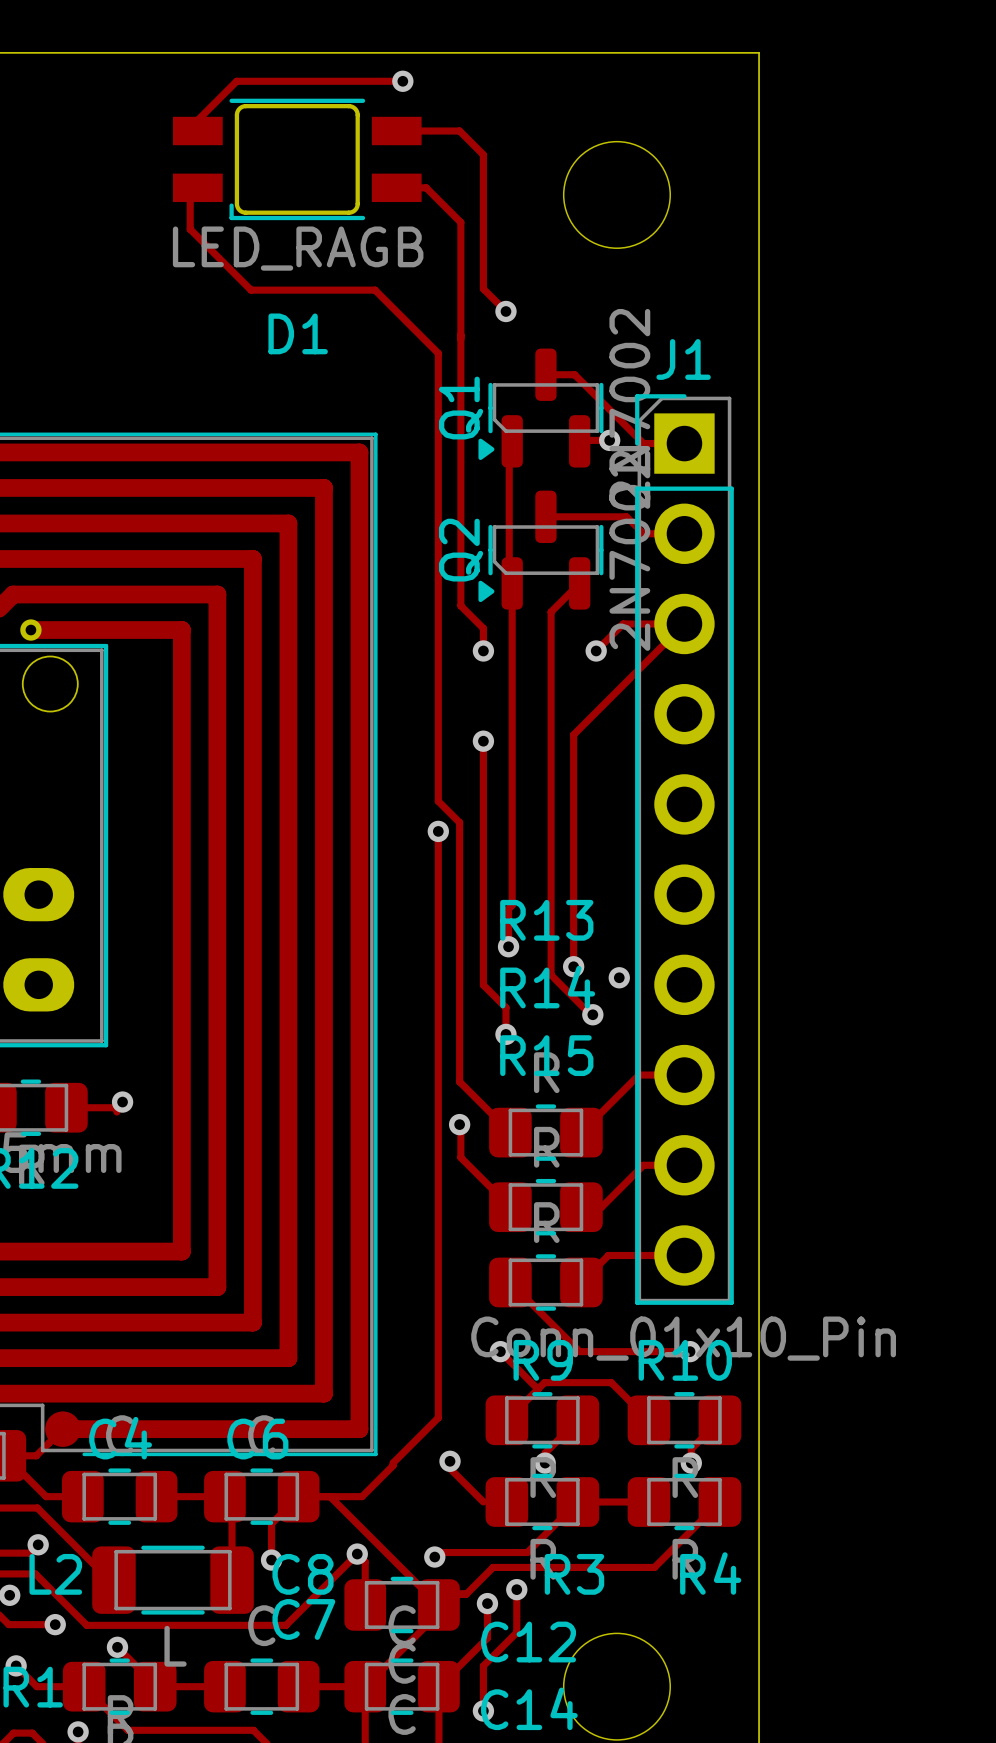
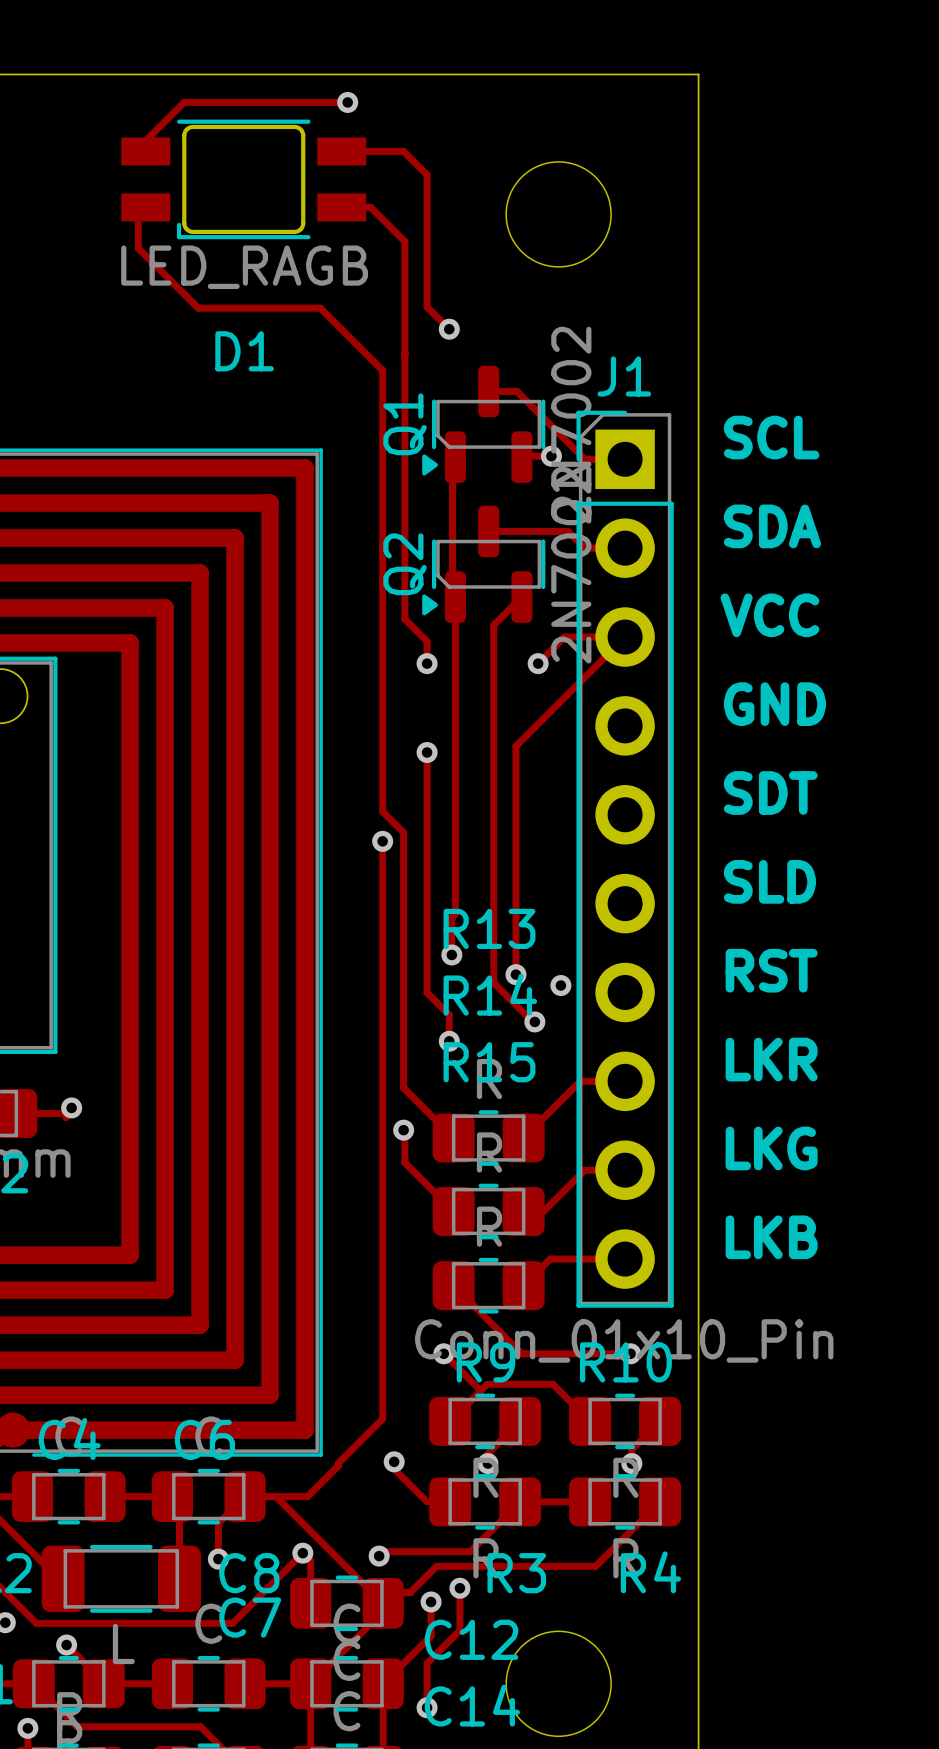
text: none -> SCL (771, 437)
text: none -> SDA (772, 526)
text: none -> VCC (769, 615)
text: none -> GND (774, 704)
text: none -> SDT (770, 792)
text: none -> SLD (769, 881)
text: none -> RST (771, 970)
text: none -> LKR (771, 1059)
text: none -> LKG (771, 1148)
text: none -> LKB (771, 1237)

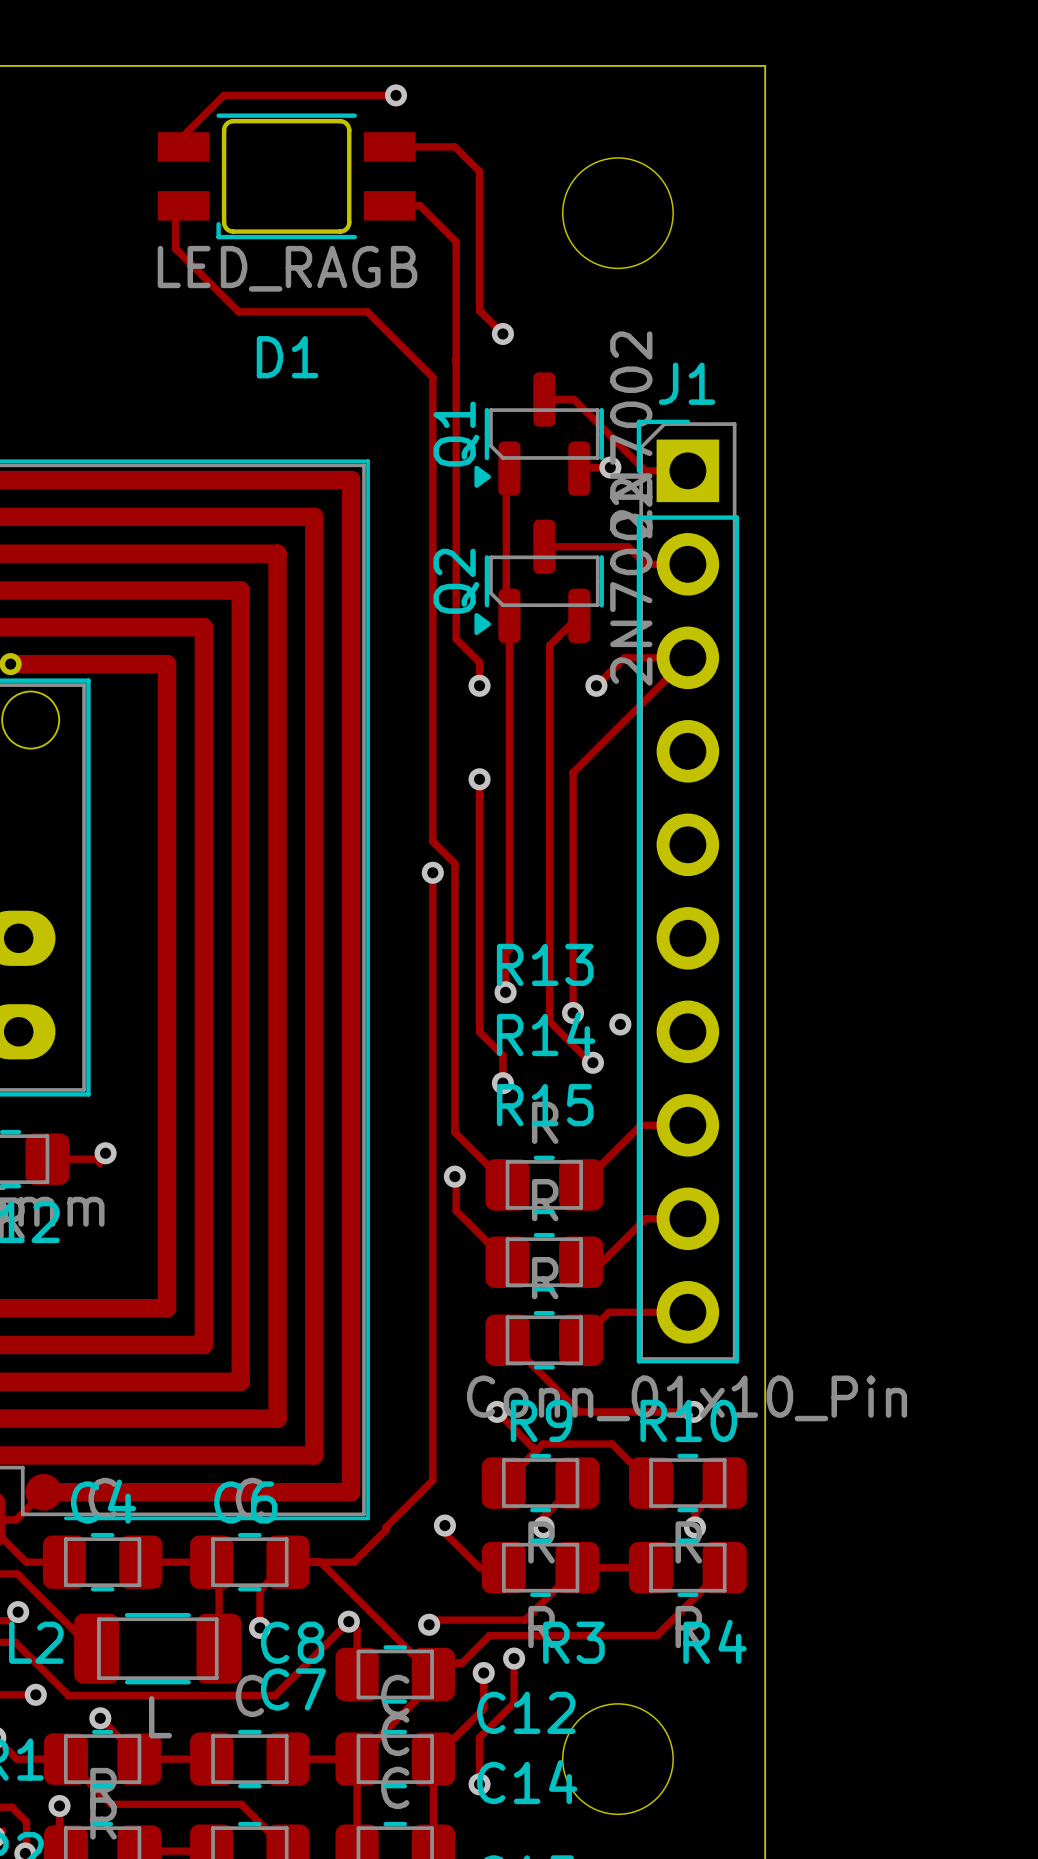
text: SCL (771, 437) -> none
text: SDA (772, 526) -> none
text: VCC (769, 615) -> none
text: GND (774, 704) -> none
text: SDT (770, 792) -> none
text: SLD (769, 881) -> none
text: RST (771, 970) -> none
text: LKR (771, 1059) -> none
text: LKG (771, 1148) -> none
text: LKB (771, 1237) -> none

